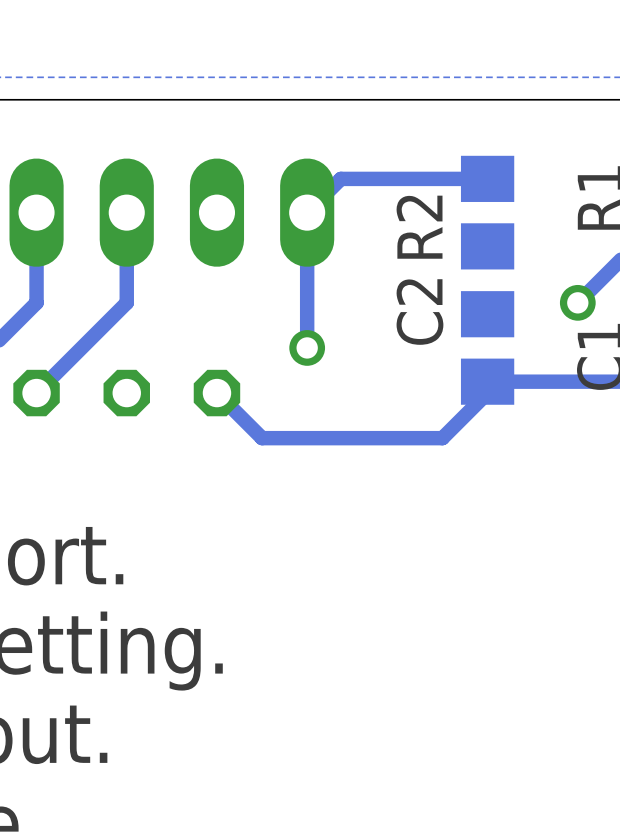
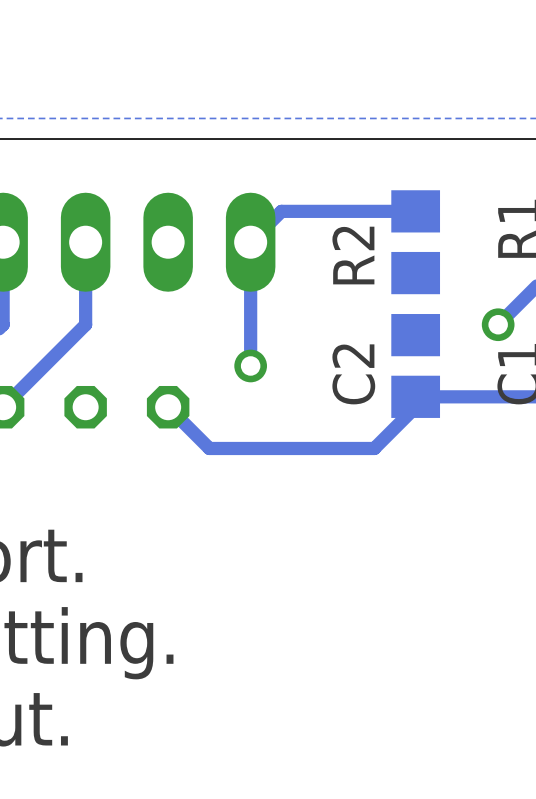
C2 name position: C2 (419, 312) -> C2 (353, 374)

